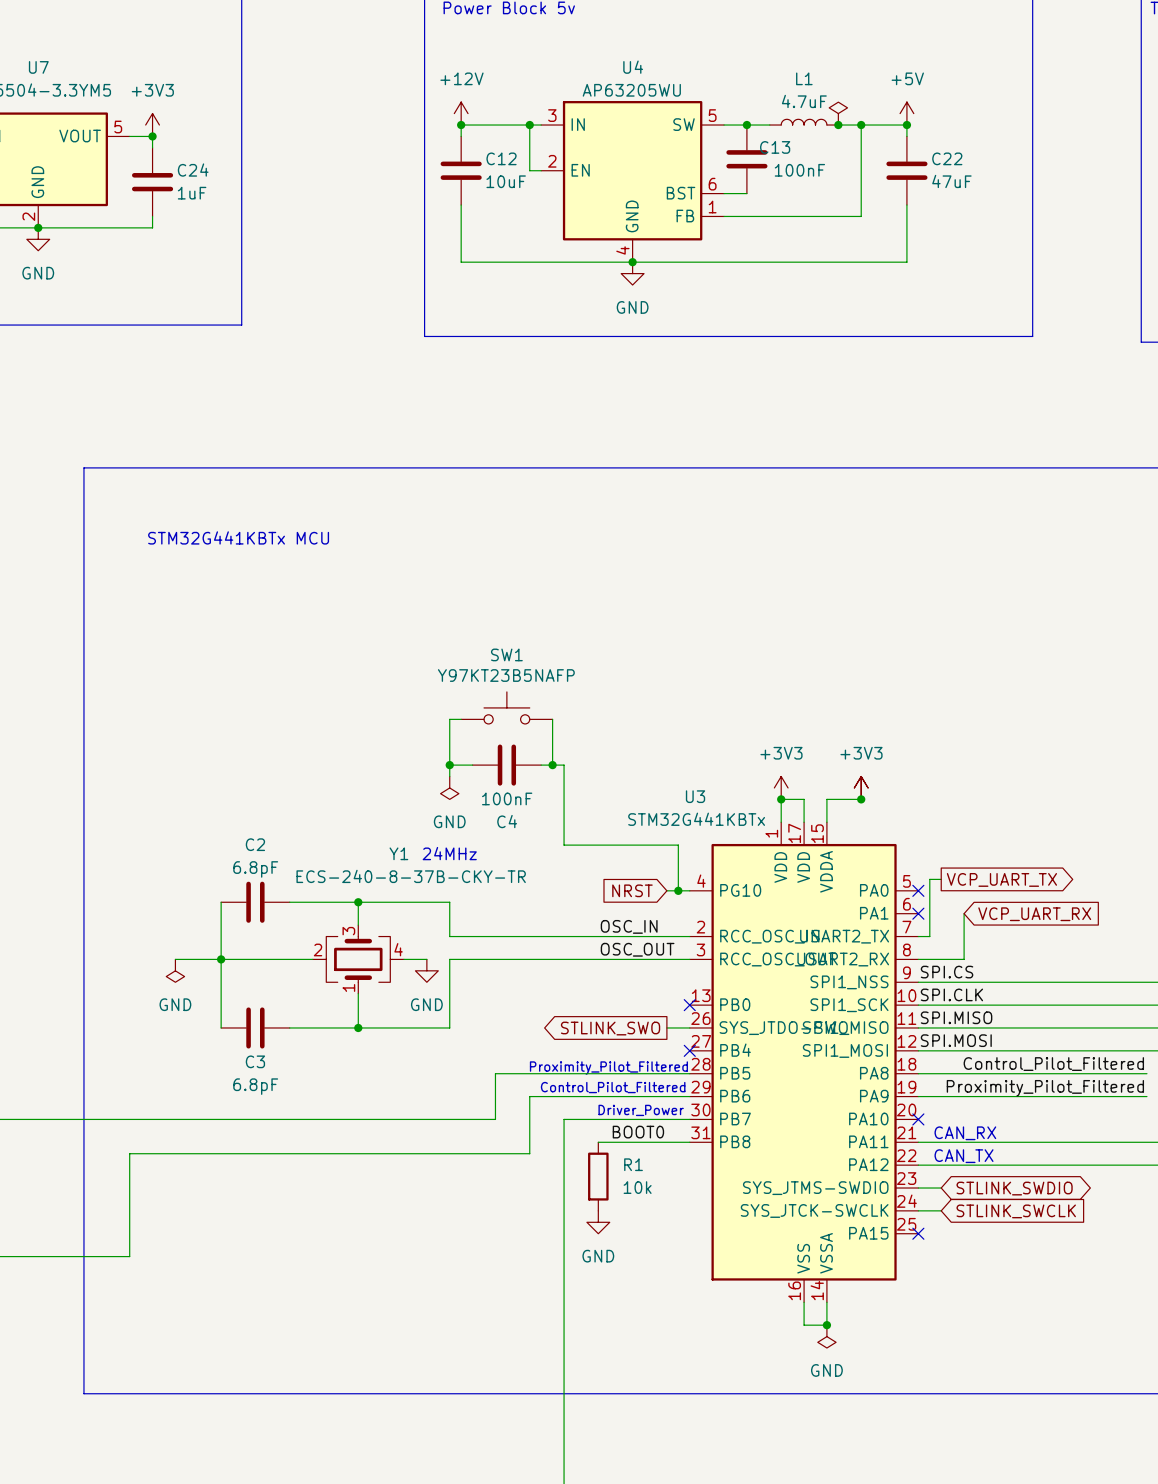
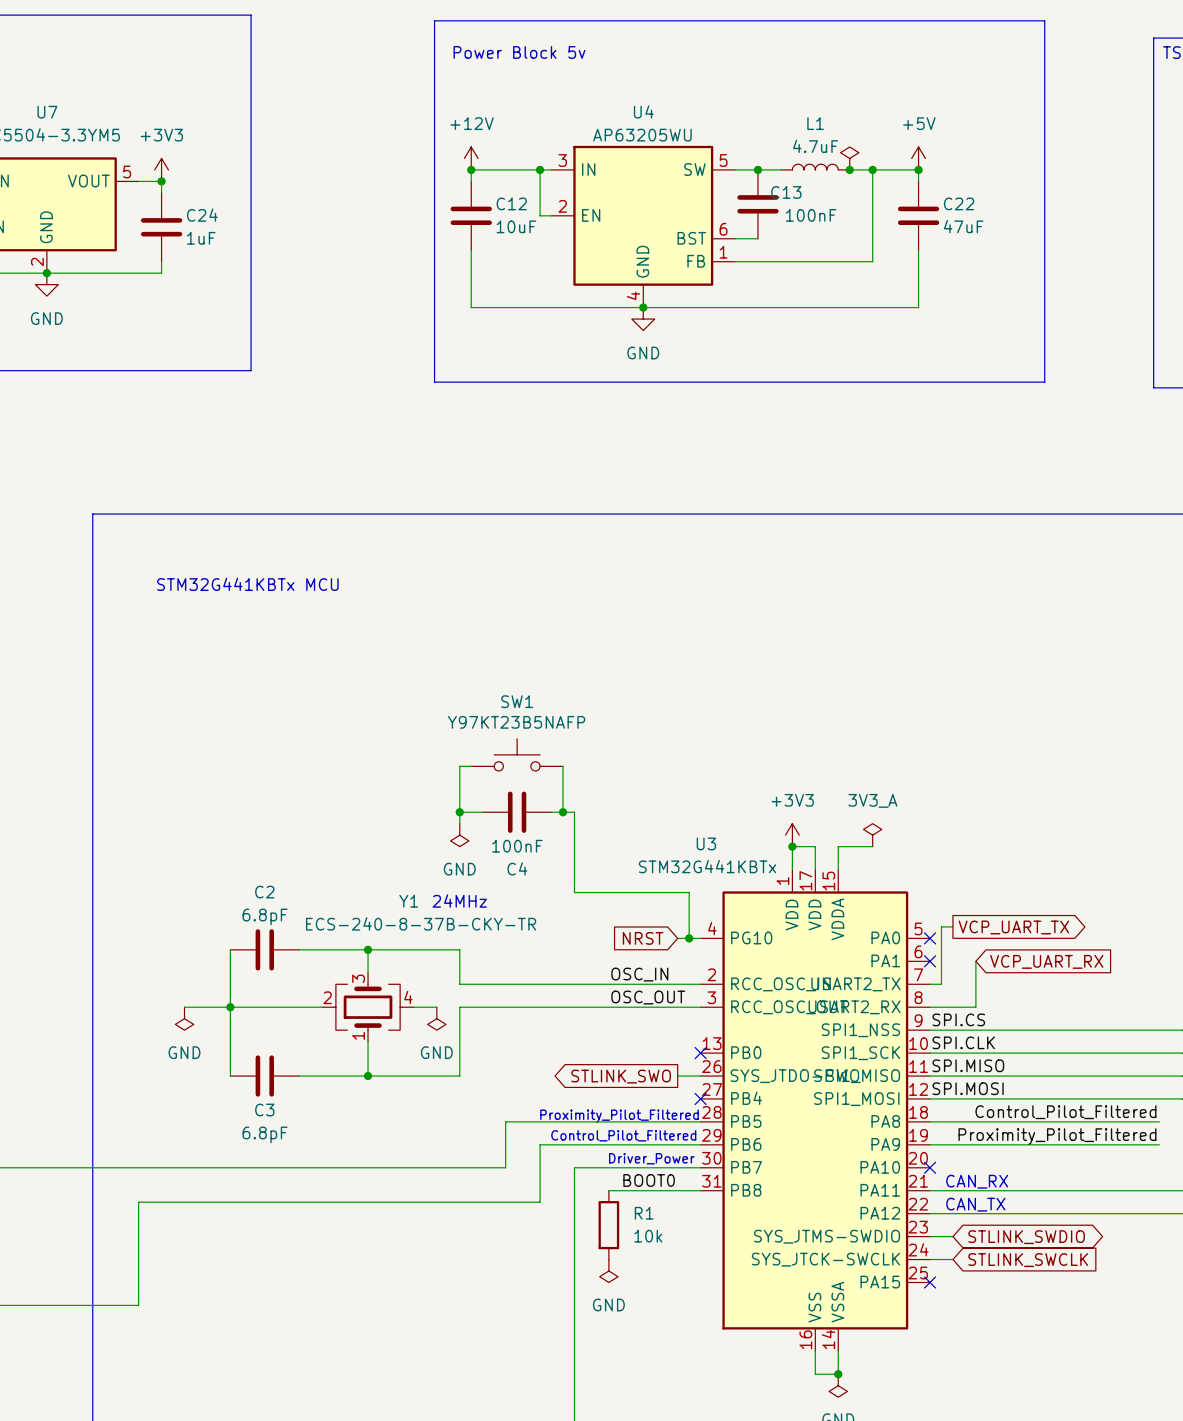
power symbol: (861, 787) -> none
power symbol: +3V3 (861, 787) -> none
power symbol: none -> 3V3_A (872, 835)
junction: (861, 799) -> none
power symbol shape: [415, 959, 439, 983] -> [427, 1007, 447, 1031]
power symbol shape: [586, 1210, 610, 1234] -> [599, 1259, 619, 1283]

